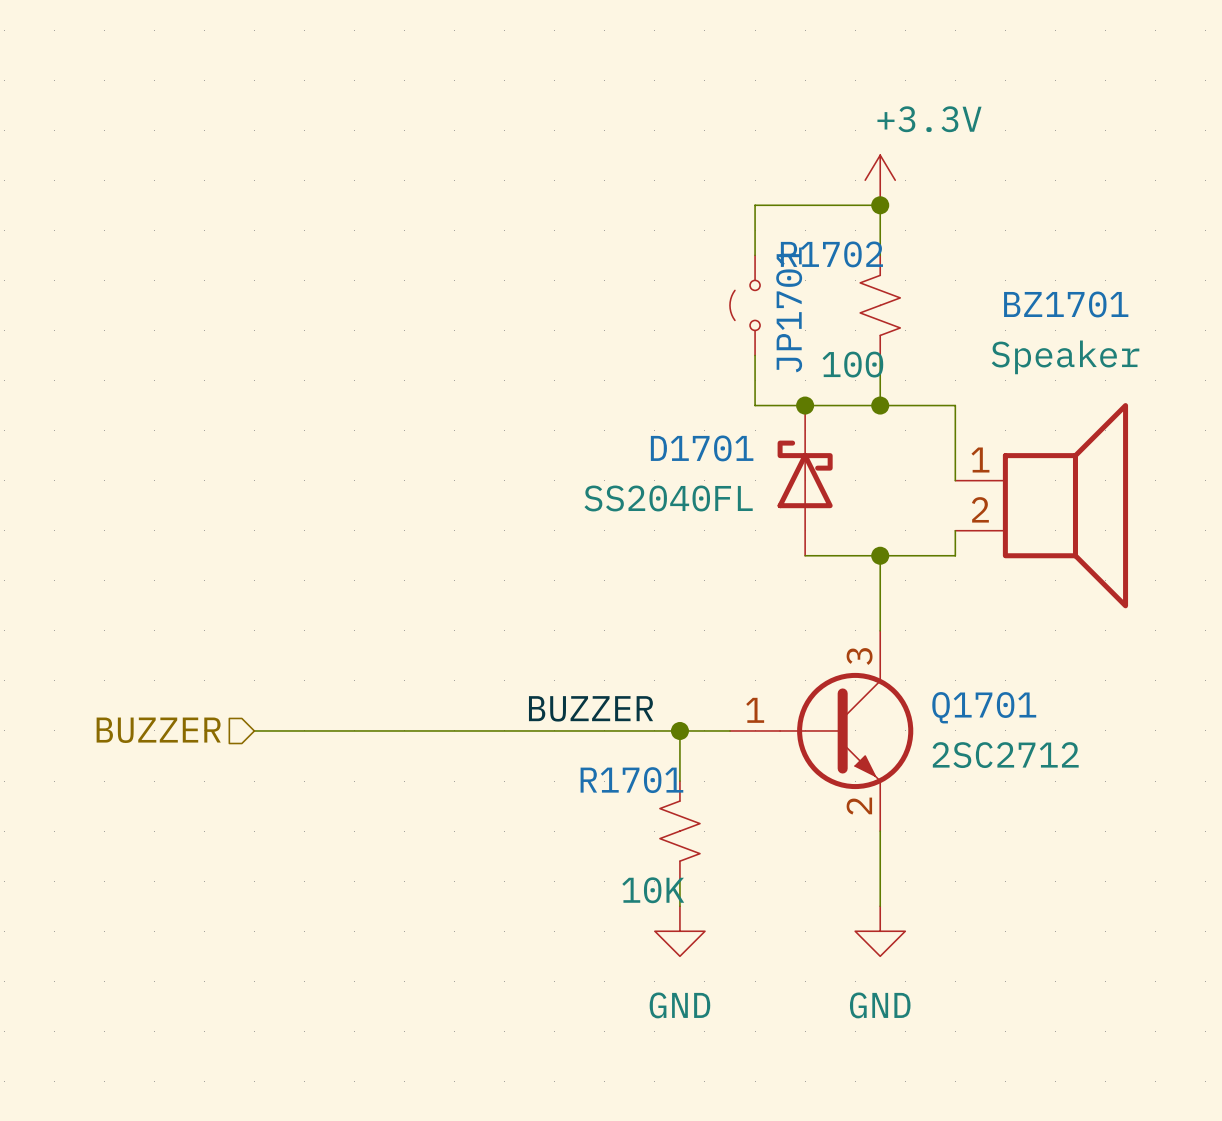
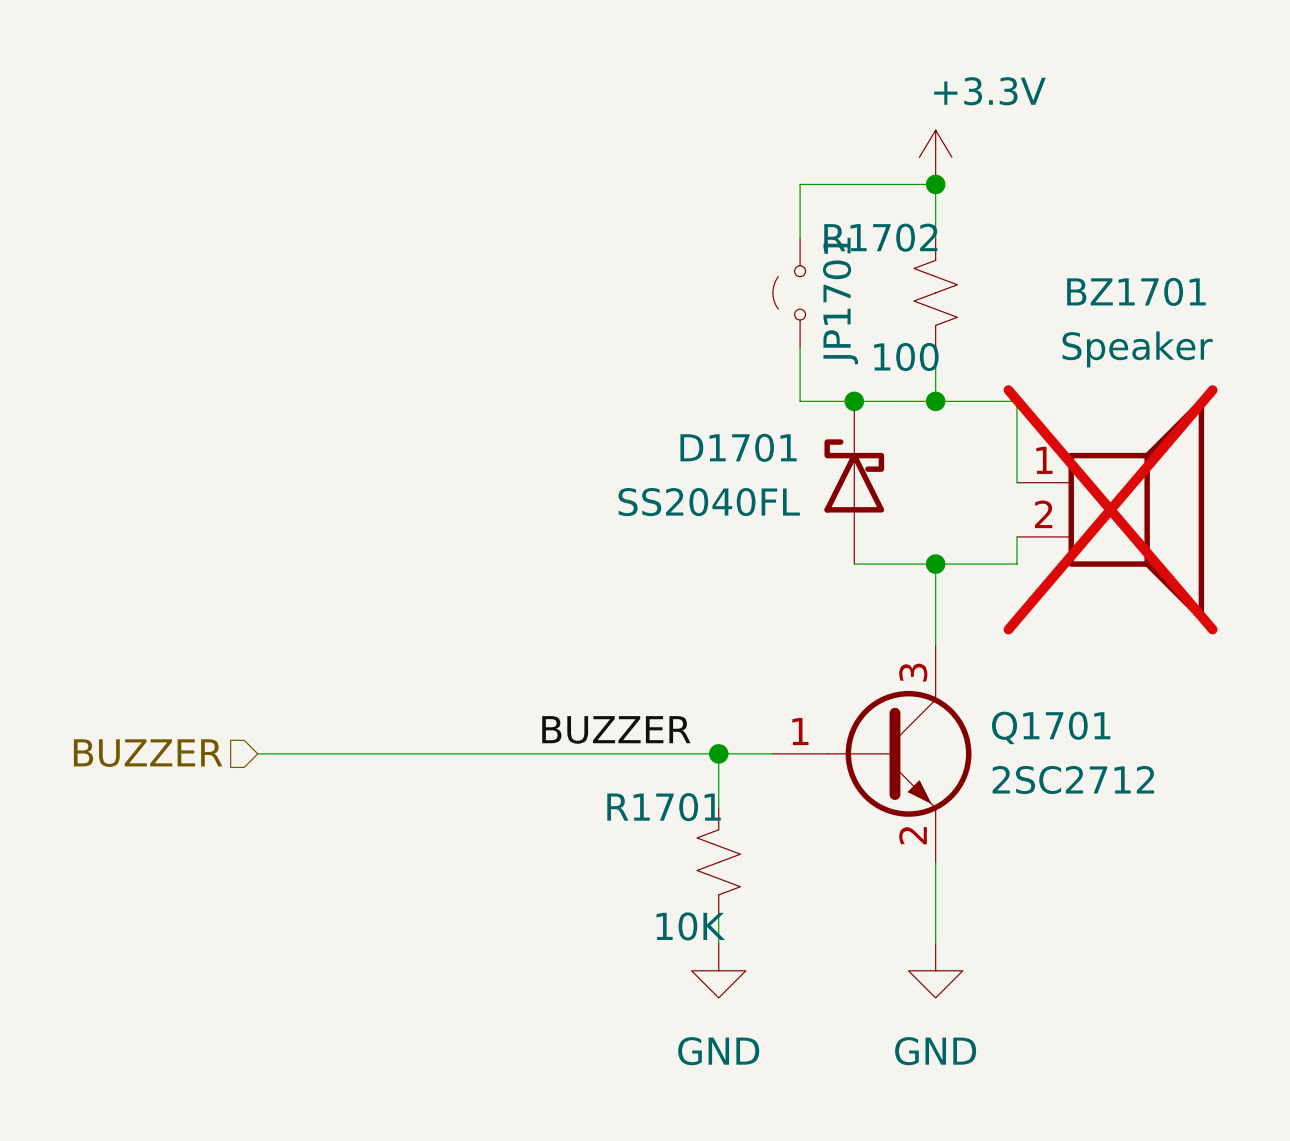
BZ1701 do-not-place cross: none -> (1110, 509)

